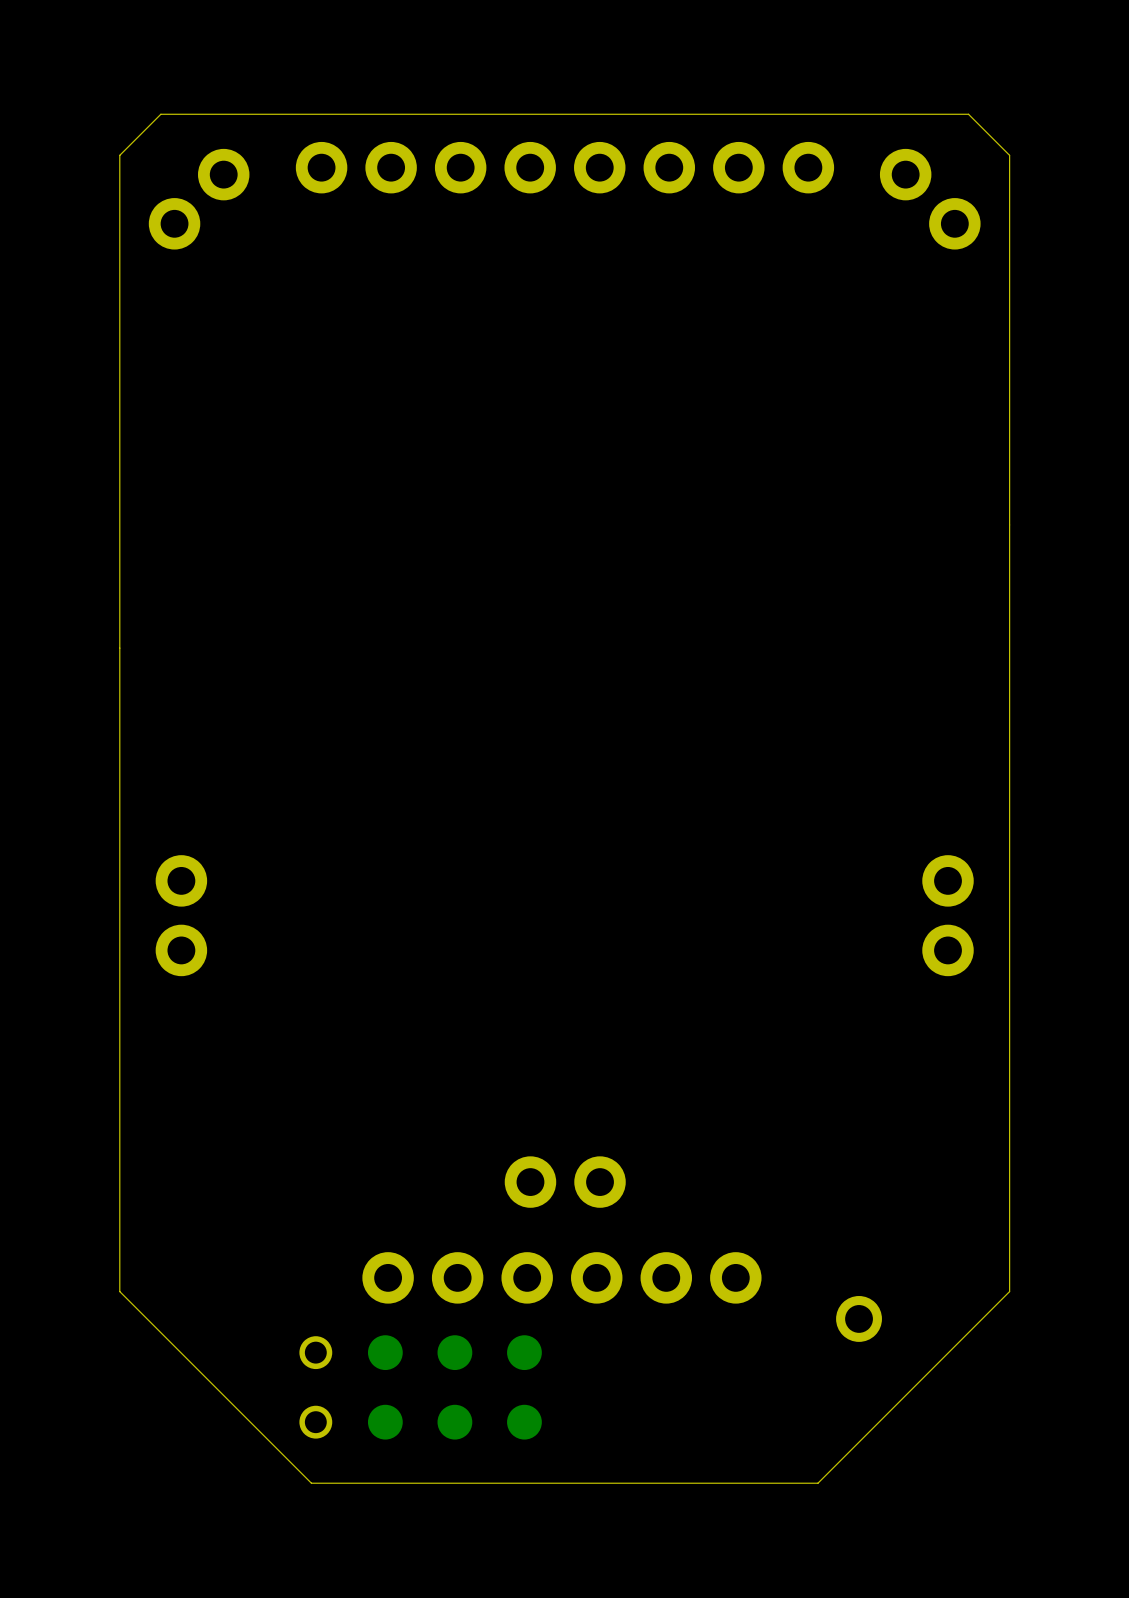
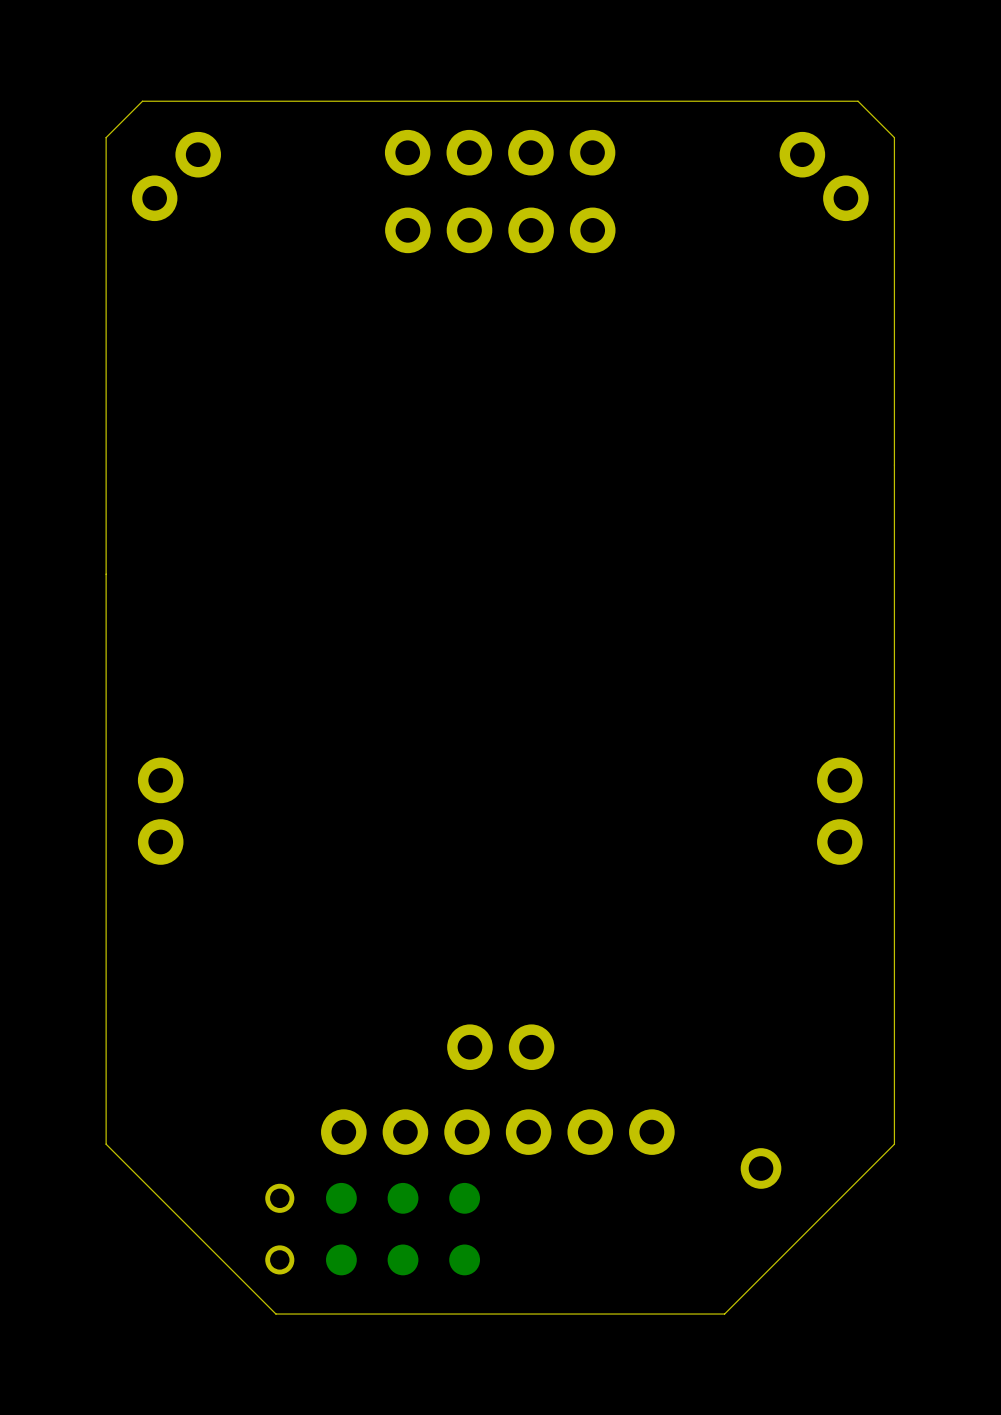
part footprint: [295, 141, 835, 194] -> [384, 129, 616, 176]
part: none -> (500, 230)

